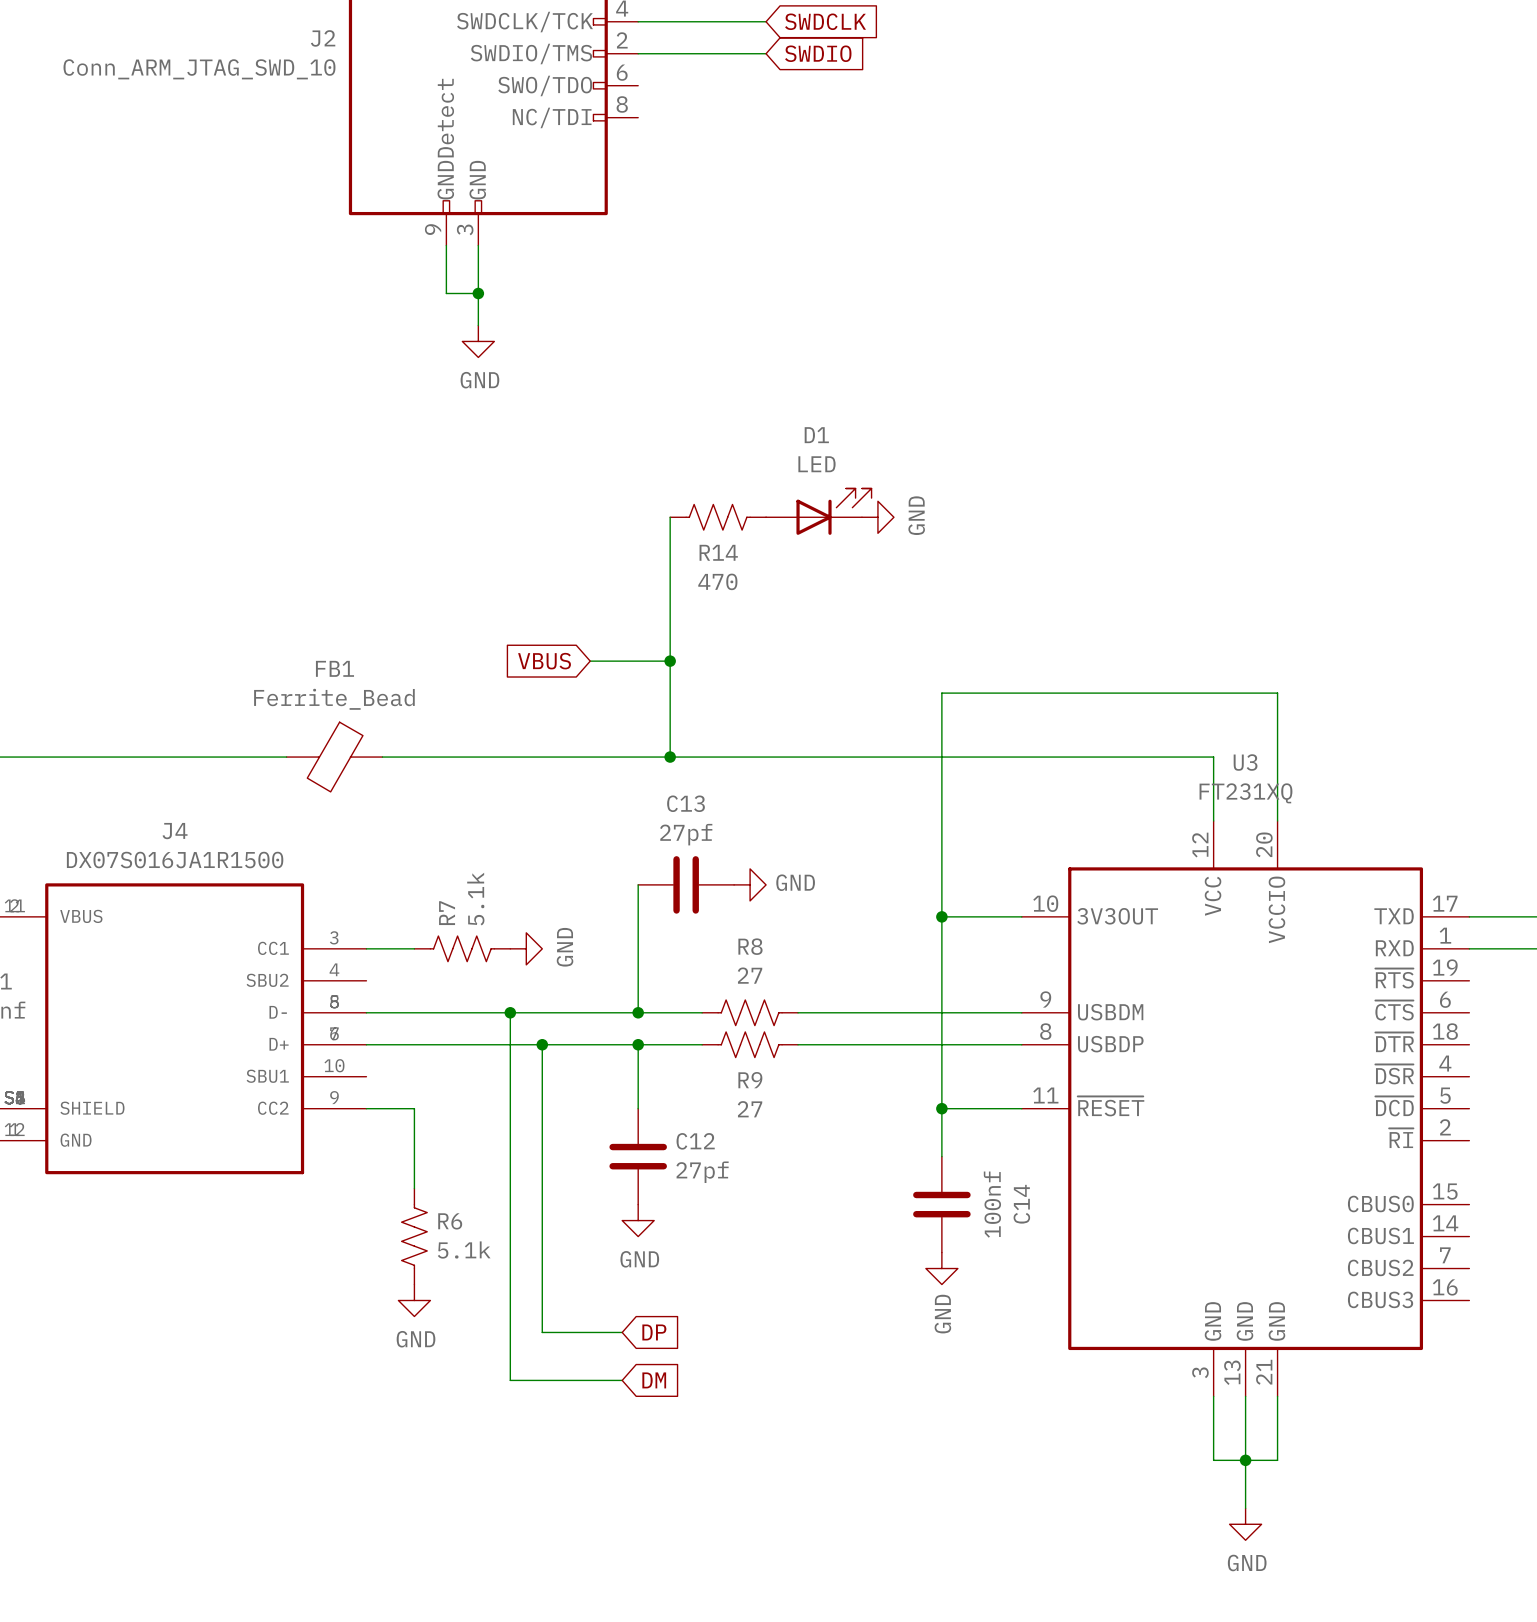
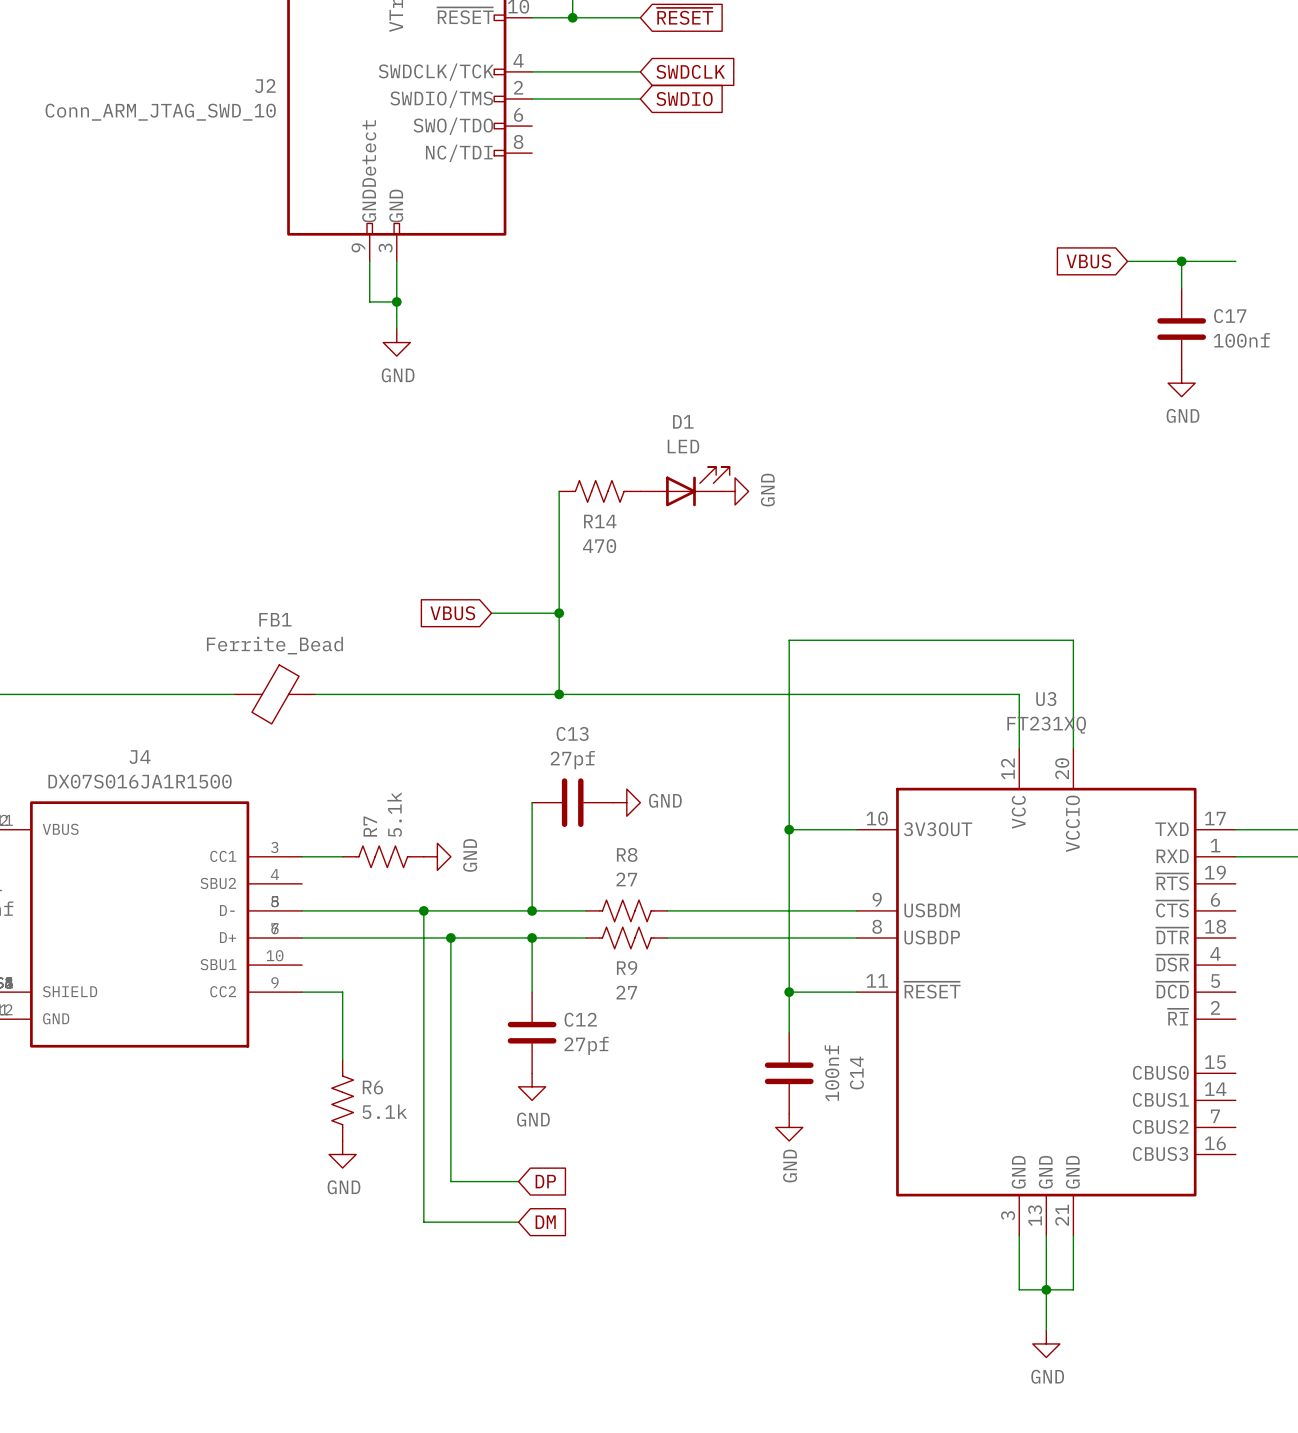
global label: none -> VBUS (1088, 261)
wire: none -> (1127, 261) (1235, 261)
wire: none -> (1181, 261) (1181, 288)
junction: none -> (1181, 261)
C17: none -> 100nf (1181, 329)
power symbol: none -> GND (1181, 383)

